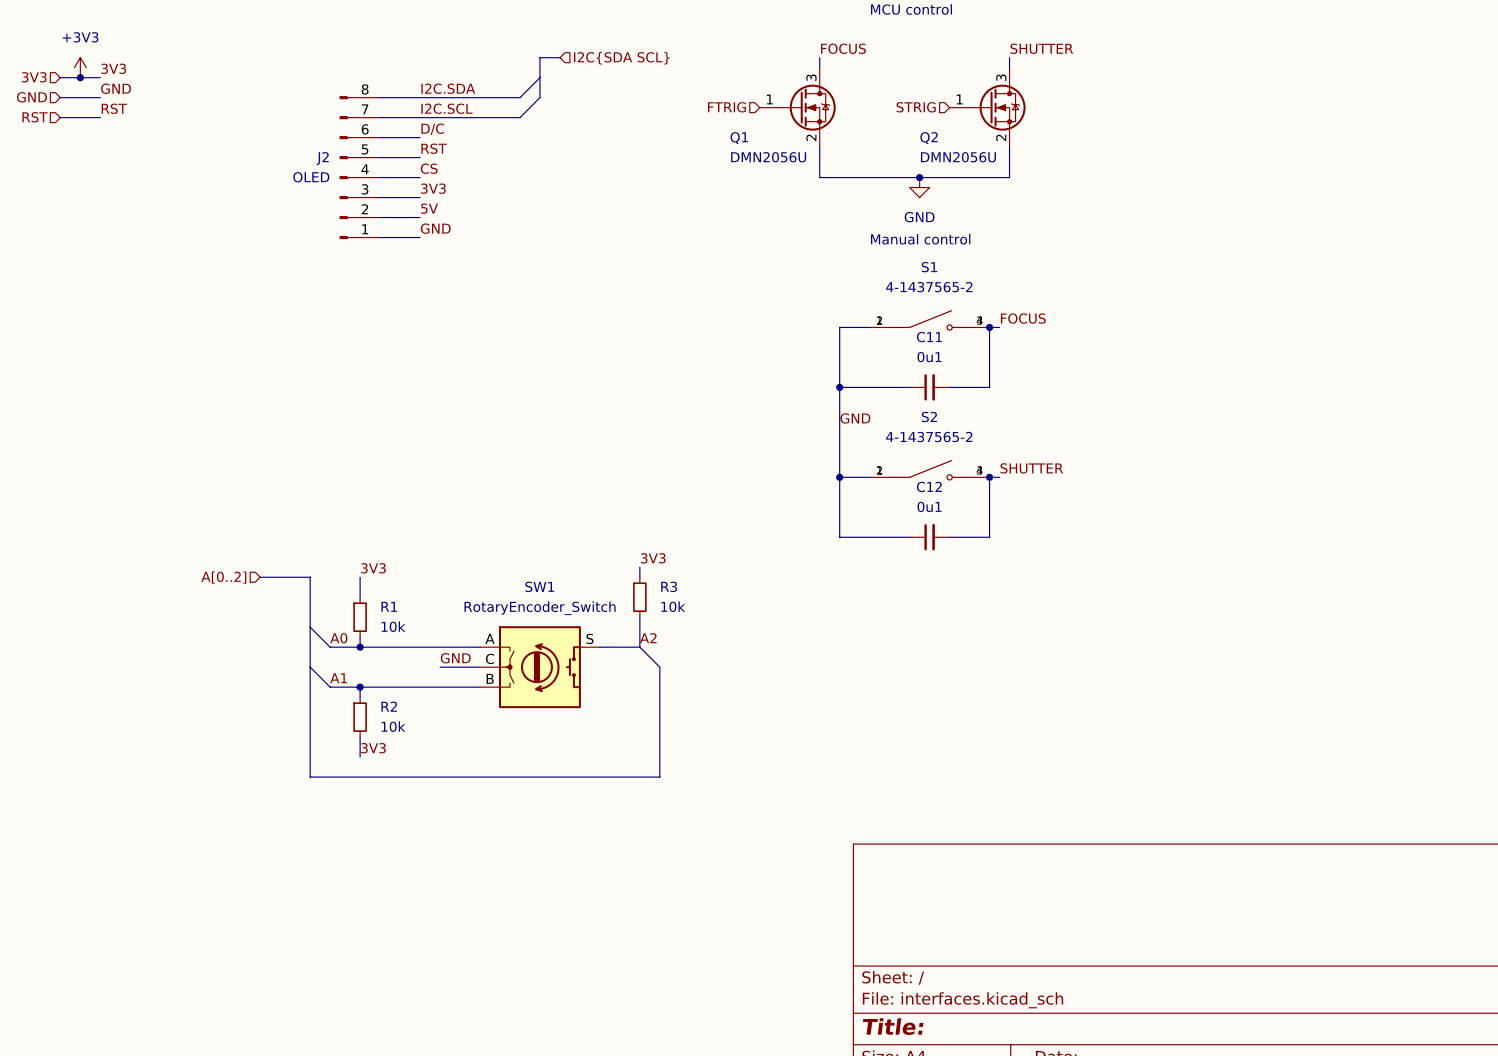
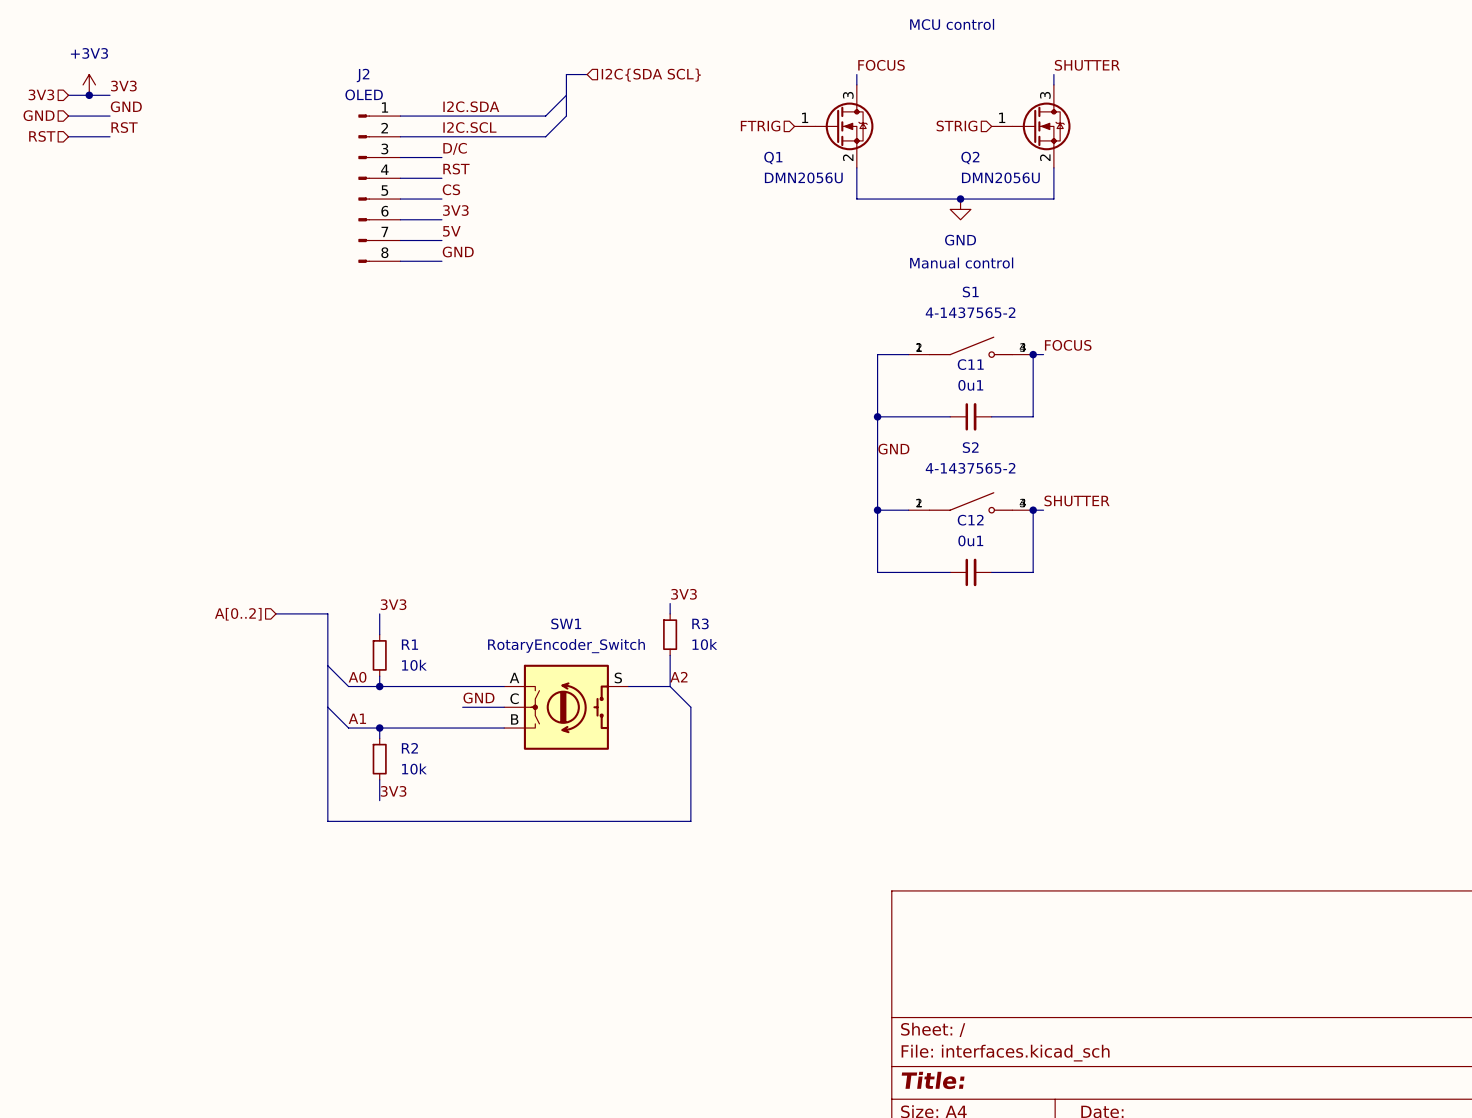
J2 name position: J2 (322, 158) -> J2 (363, 75)
J2 flip: as is (345, 167) -> up-down (364, 188)
J2 value position: OLED (311, 177) -> OLED (364, 94)

